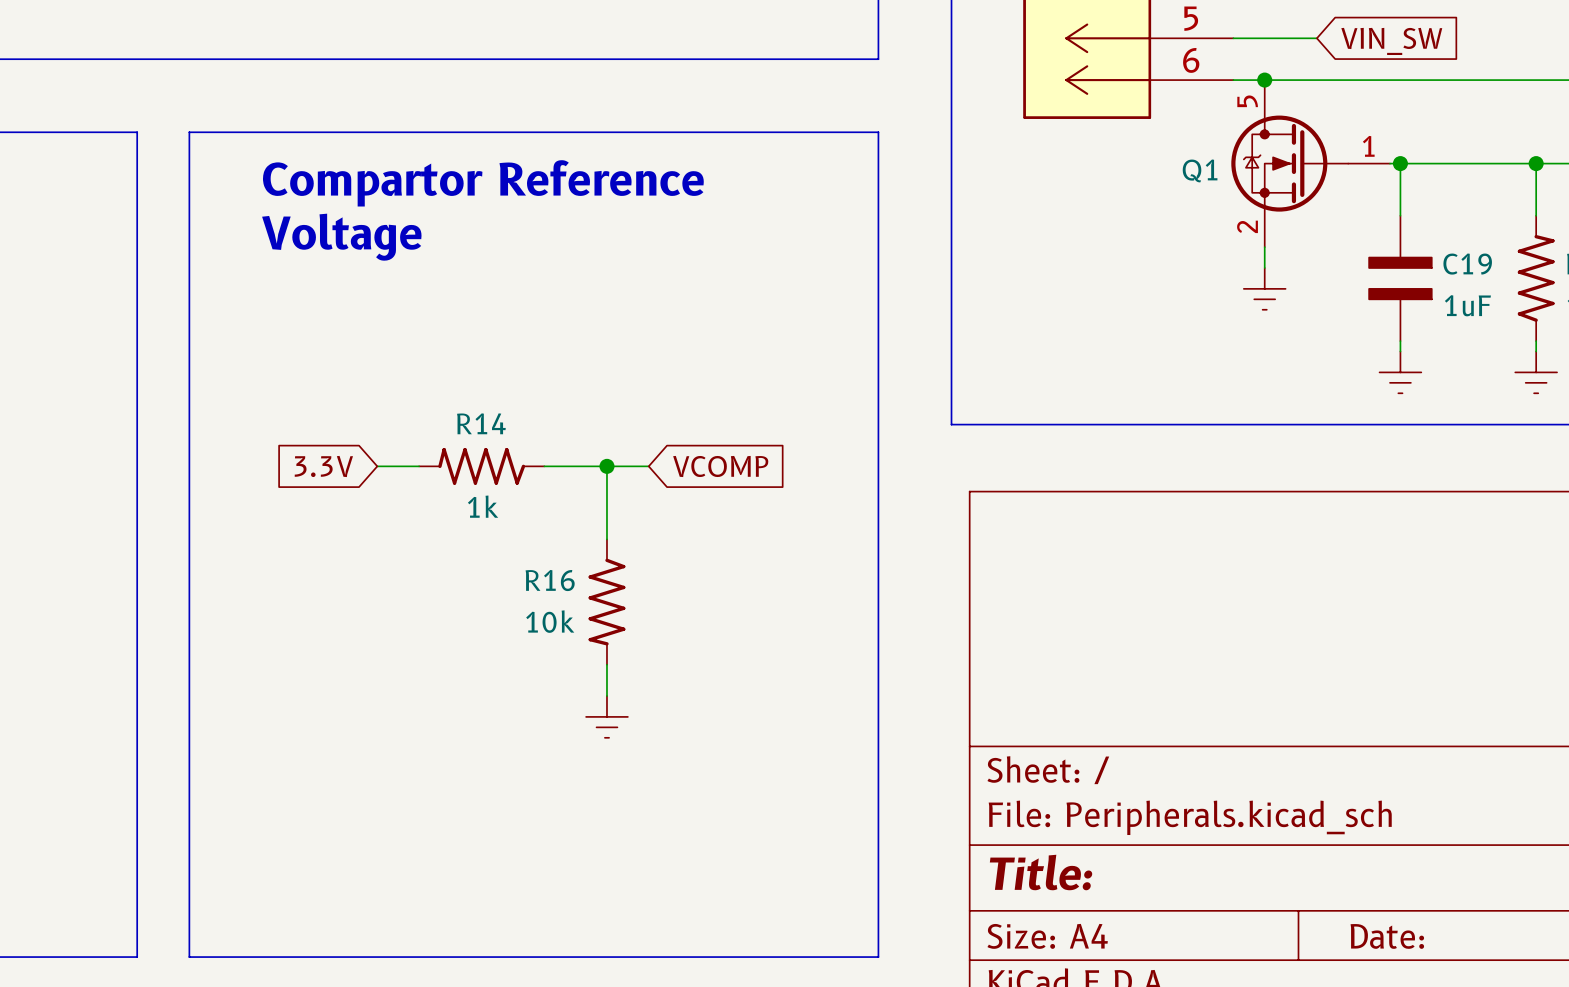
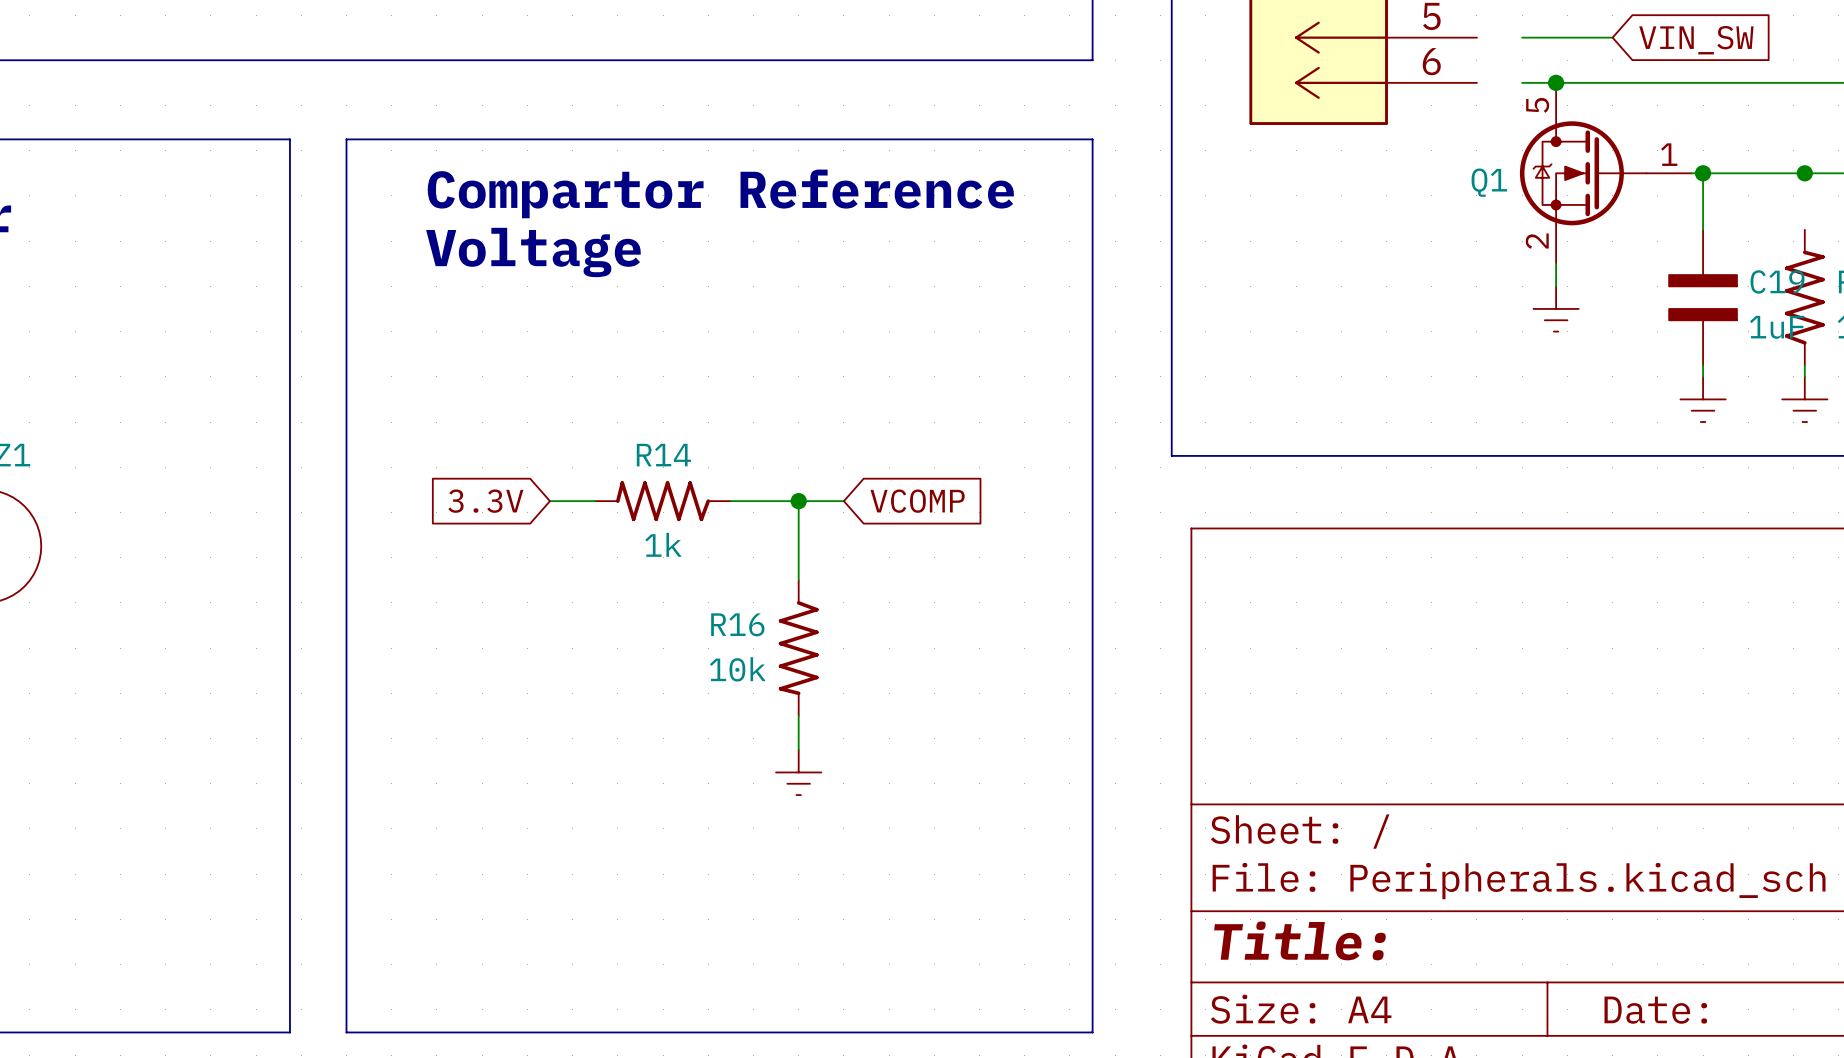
wire: (1233, 38) (1275, 38) -> (1567, 37) (1612, 37)
global label position: VIN_SW (1391, 41) -> VIN_SW (1696, 40)
wire: (1233, 80) (1275, 80) -> none
junction position: (1264, 80) -> (1556, 82)
Q1 position: (1310, 163) -> (1605, 173)
wire: (1400, 163) (1400, 215) -> (1703, 173) (1703, 229)
junction position: (1400, 163) -> (1703, 173)
wire: (1536, 163) (1536, 215) -> none
wire: (1264, 247) (1264, 267) -> (1556, 263) (1556, 286)
C19 position: (1400, 278) -> (1703, 297)
power symbol position: (1264, 288) -> (1556, 308)
wire: (1400, 341) (1400, 351) -> (1703, 365) (1703, 376)
power symbol position: (1400, 372) -> (1703, 399)

